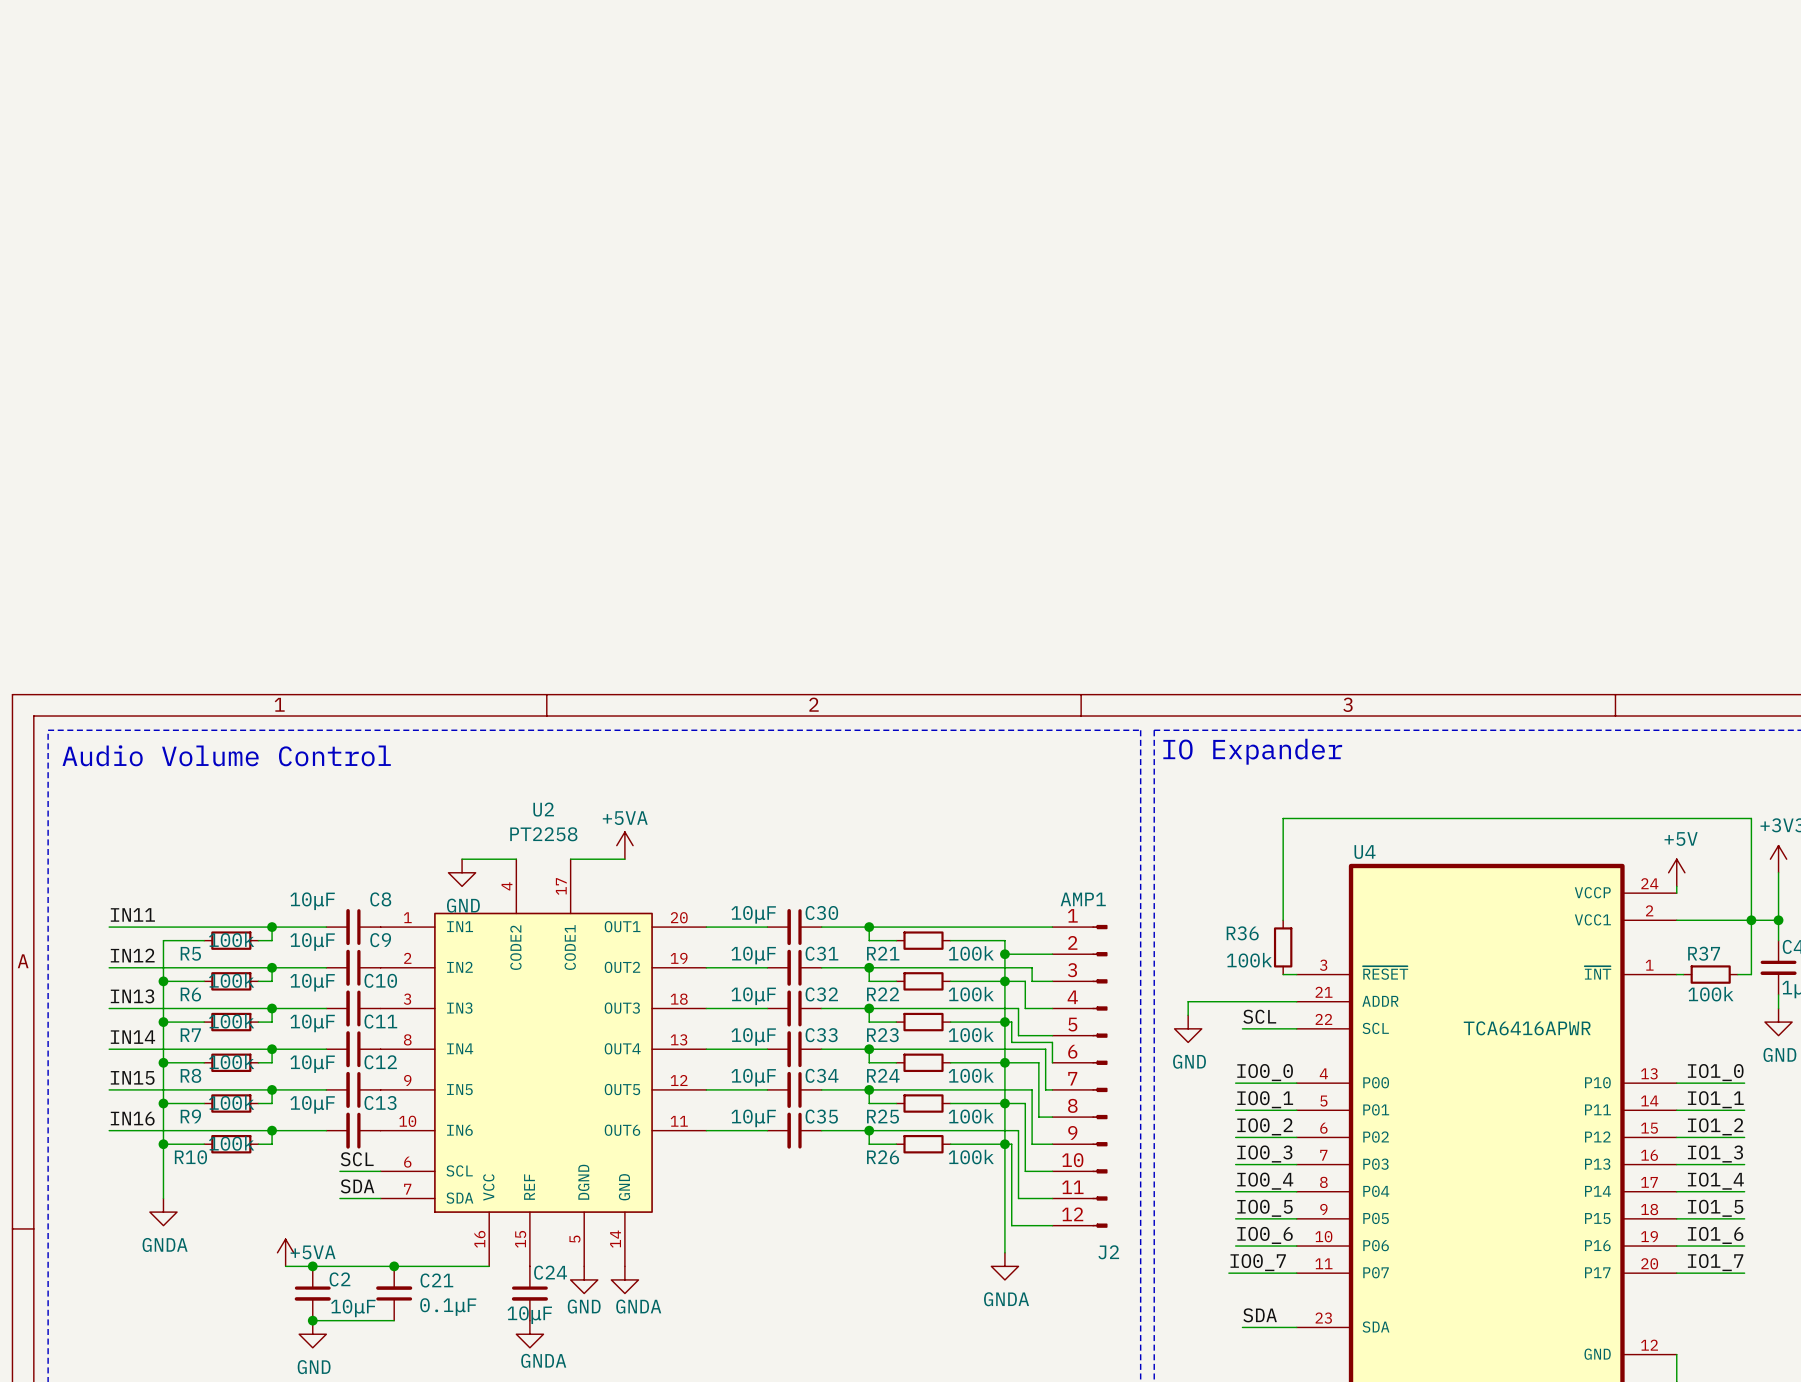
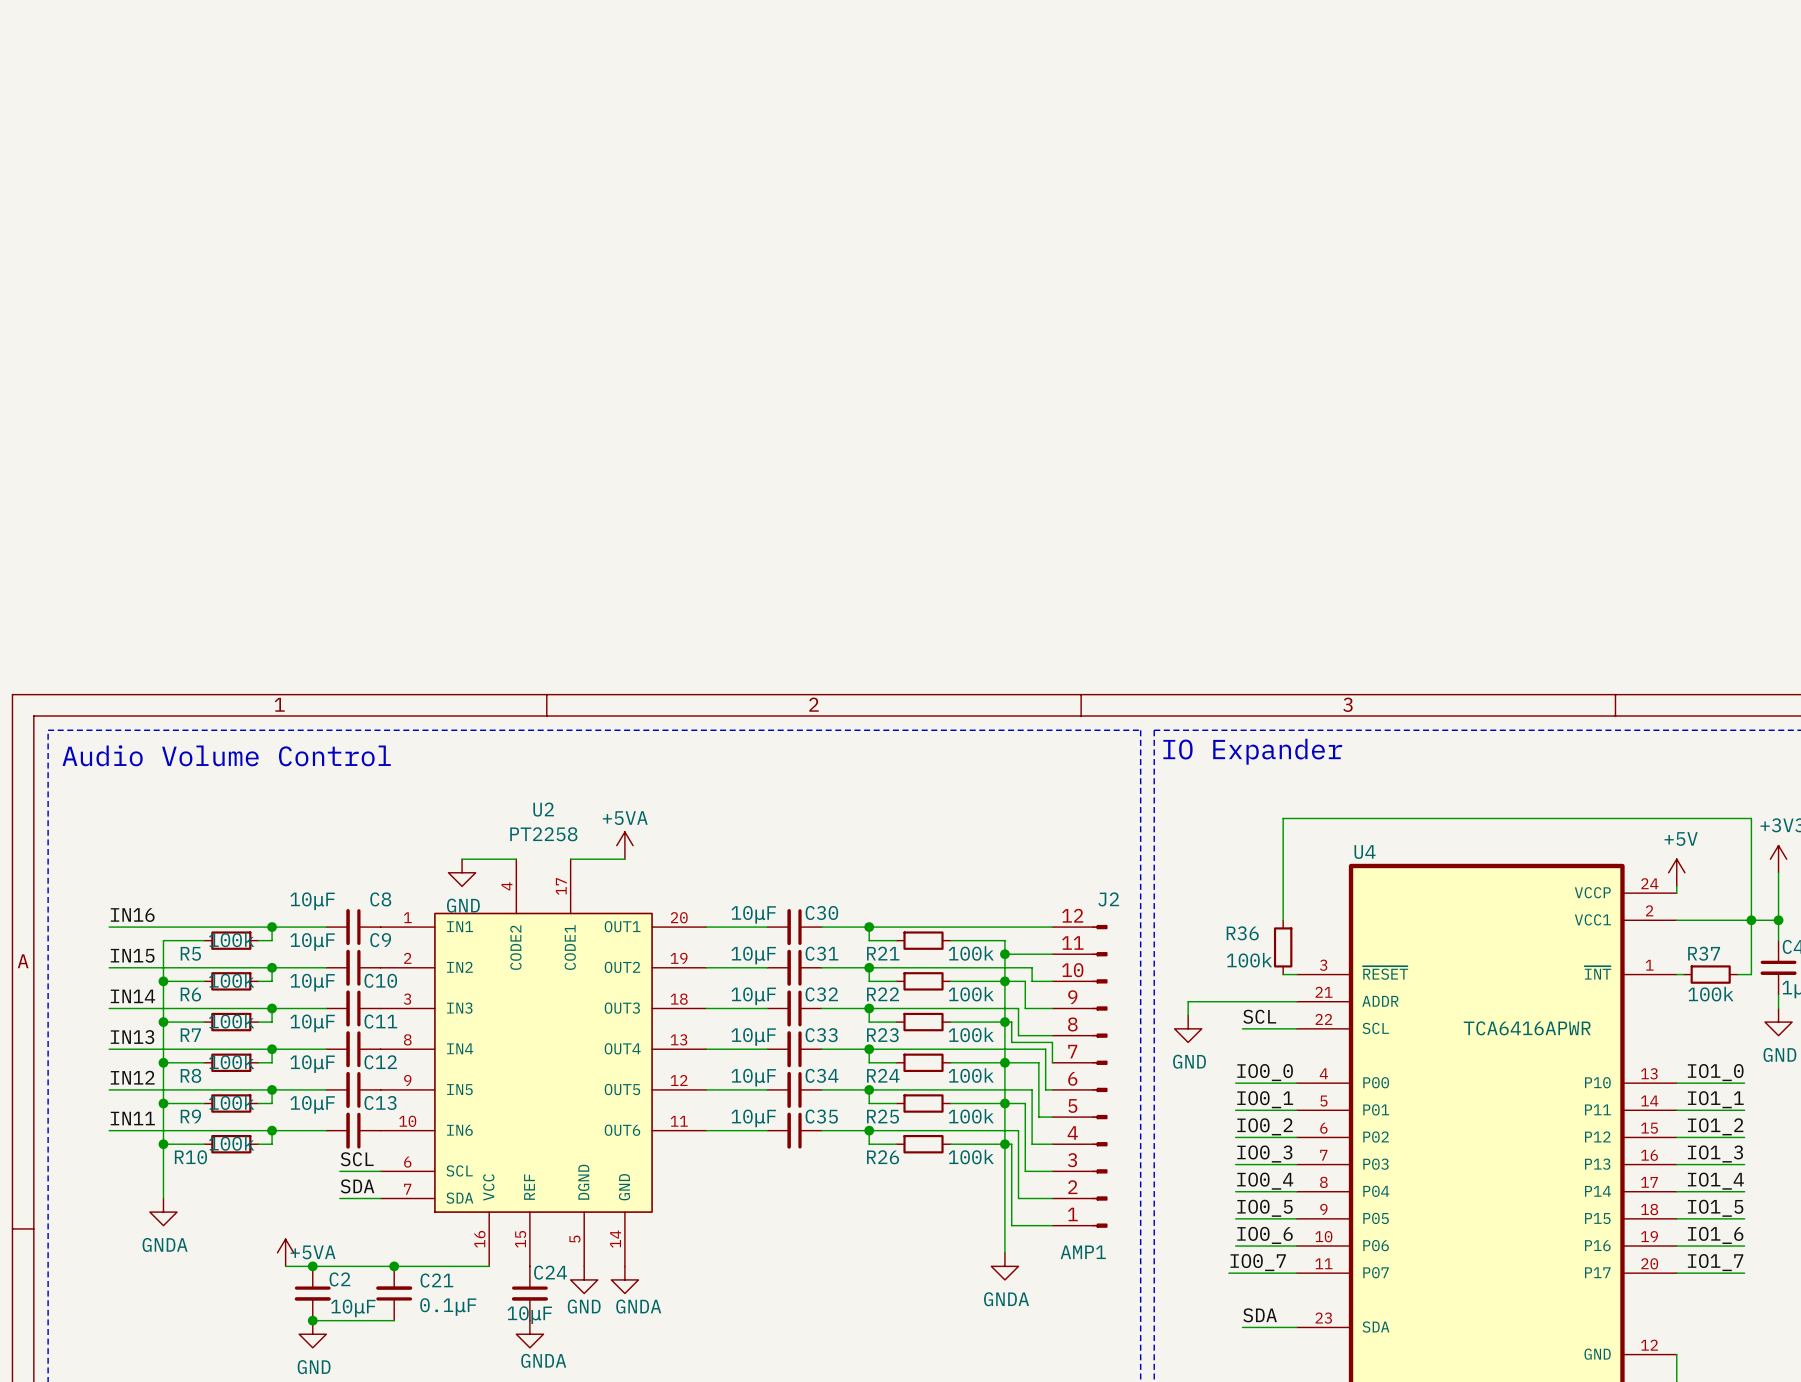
label: IN11 (132, 914) -> IN16 (132, 915)
label: IN12 (132, 955) -> IN15 (132, 955)
label: IN13 (132, 996) -> IN14 (132, 996)
label: IN14 (132, 1037) -> IN13 (132, 1037)
J2 flip: as is (1099, 1076) -> up-down (1099, 1076)
label: IN15 (132, 1077) -> IN12 (132, 1077)
label: IN16 (132, 1118) -> IN11 (132, 1118)

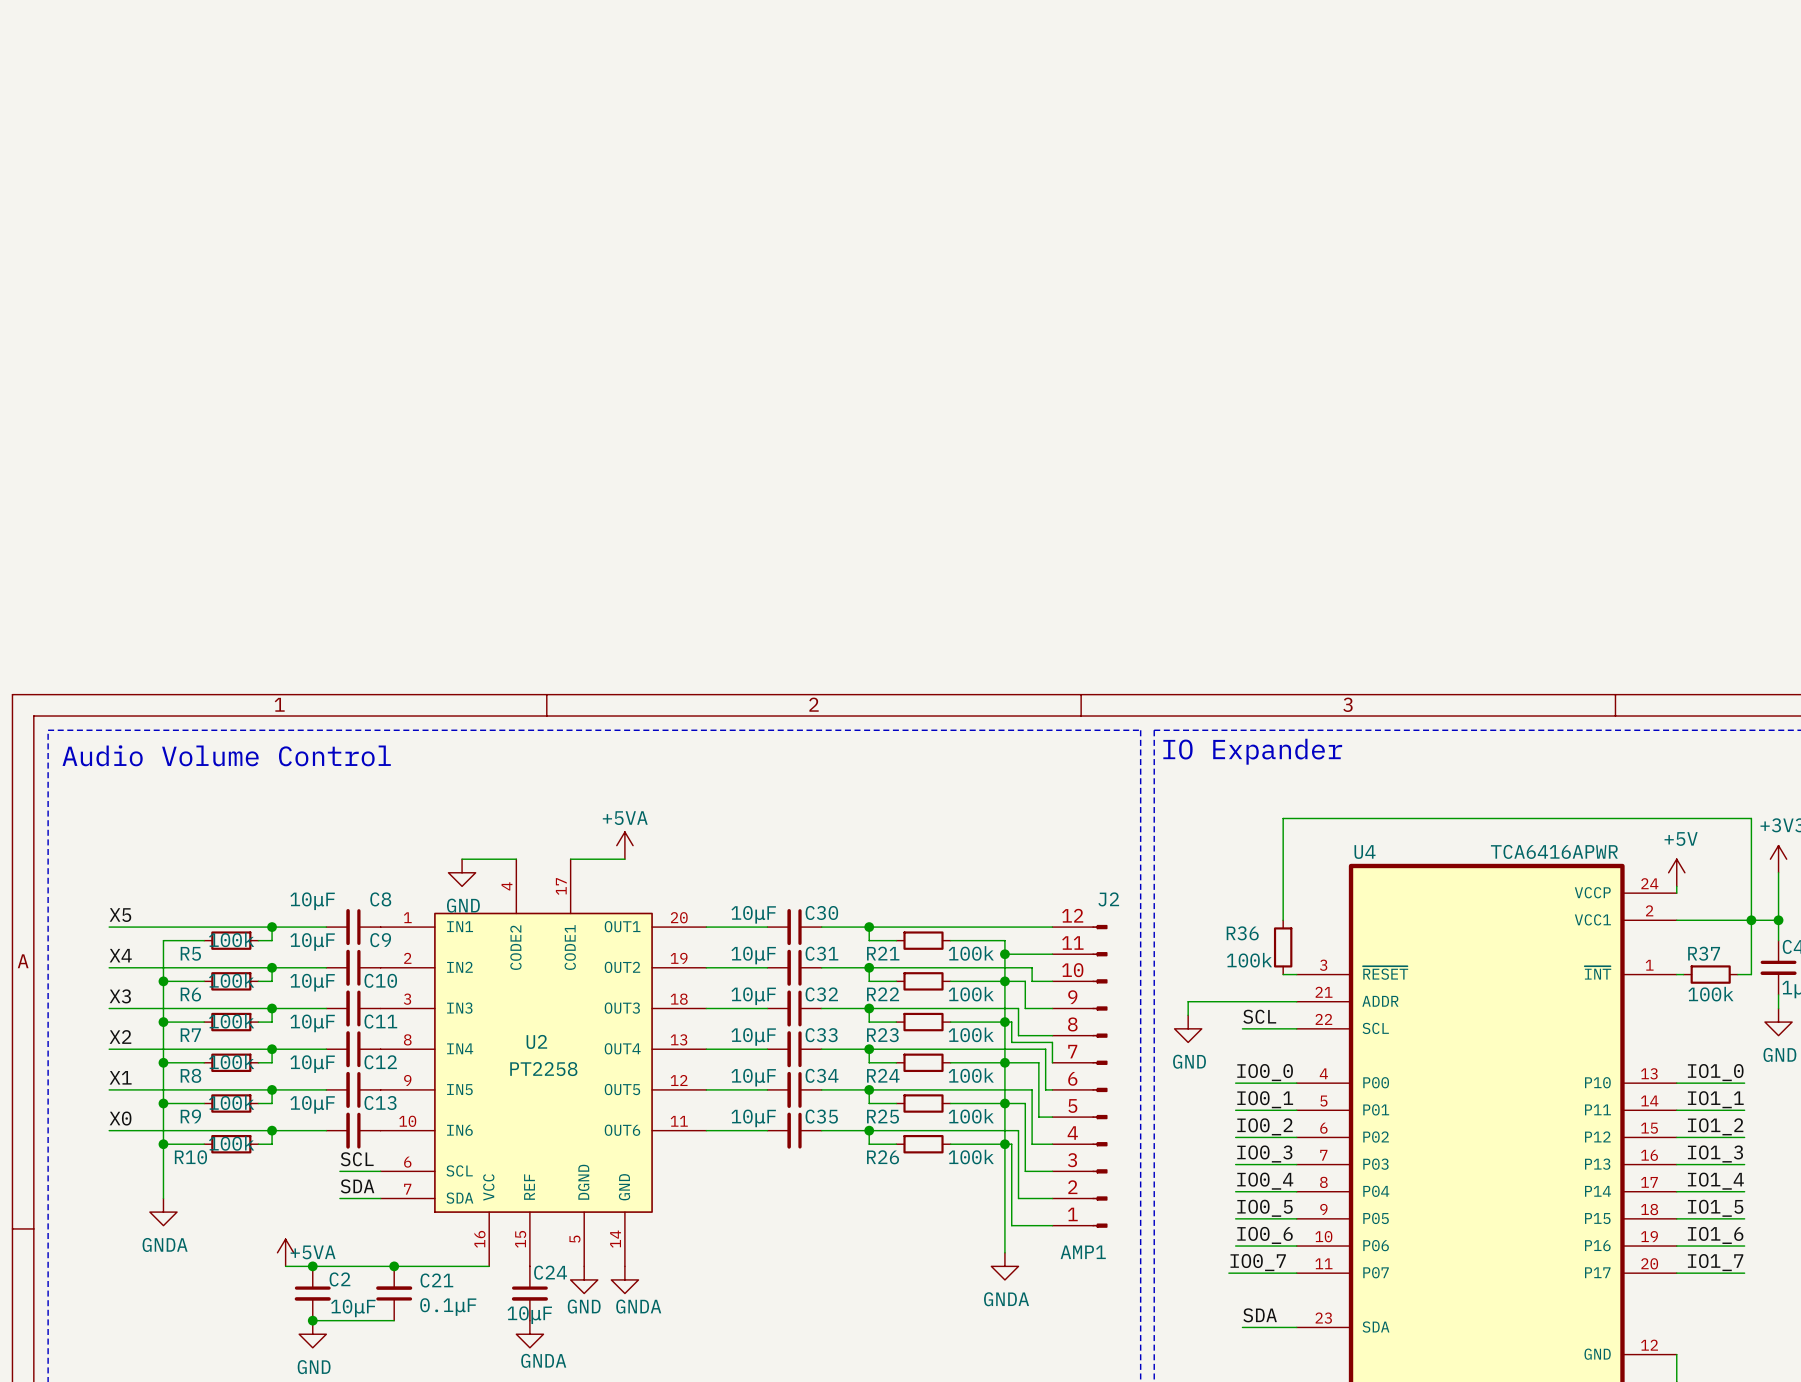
U2 name position: U2 (543, 809) -> U2 (536, 1041)
U2 value position: PT2258 (543, 834) -> PT2258 (543, 1069)
label: IN16 (132, 915) -> X5 (120, 915)
label: IN15 (132, 955) -> X4 (120, 955)
label: IN14 (132, 996) -> X3 (120, 996)
U4 value position: TCA6416APWR (1527, 1028) -> TCA6416APWR (1554, 851)
label: IN13 (132, 1037) -> X2 (120, 1036)
label: IN12 (132, 1077) -> X1 (120, 1077)
label: IN11 (132, 1118) -> X0 (120, 1118)

